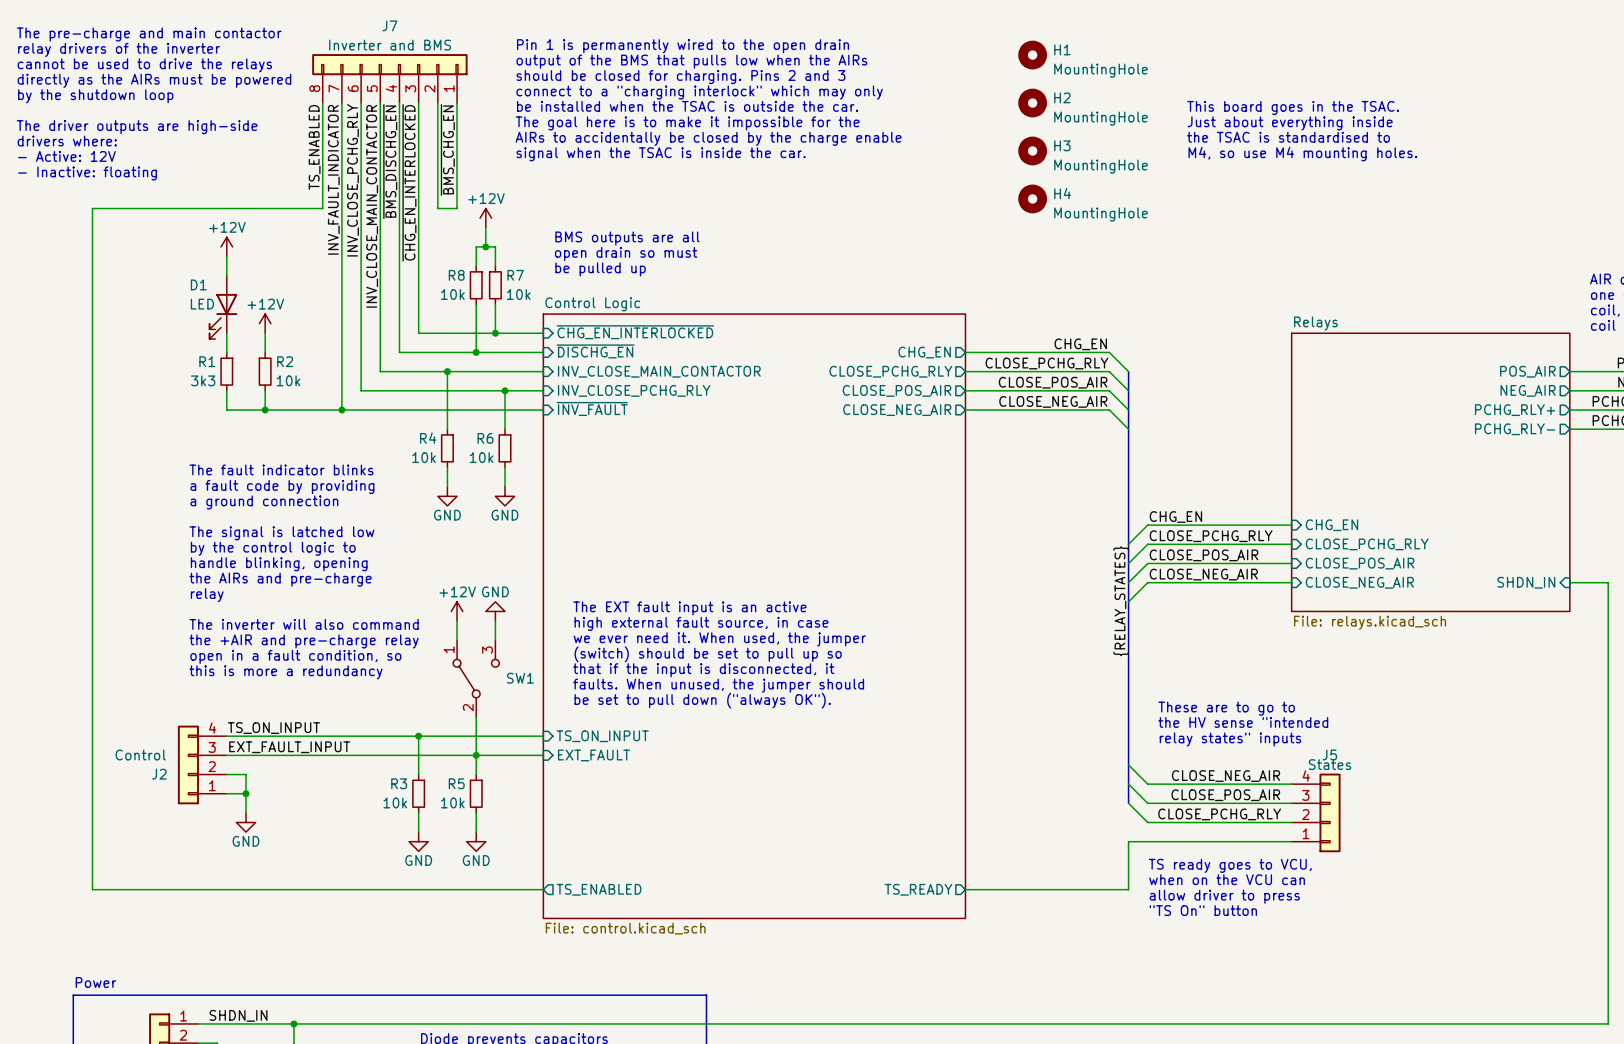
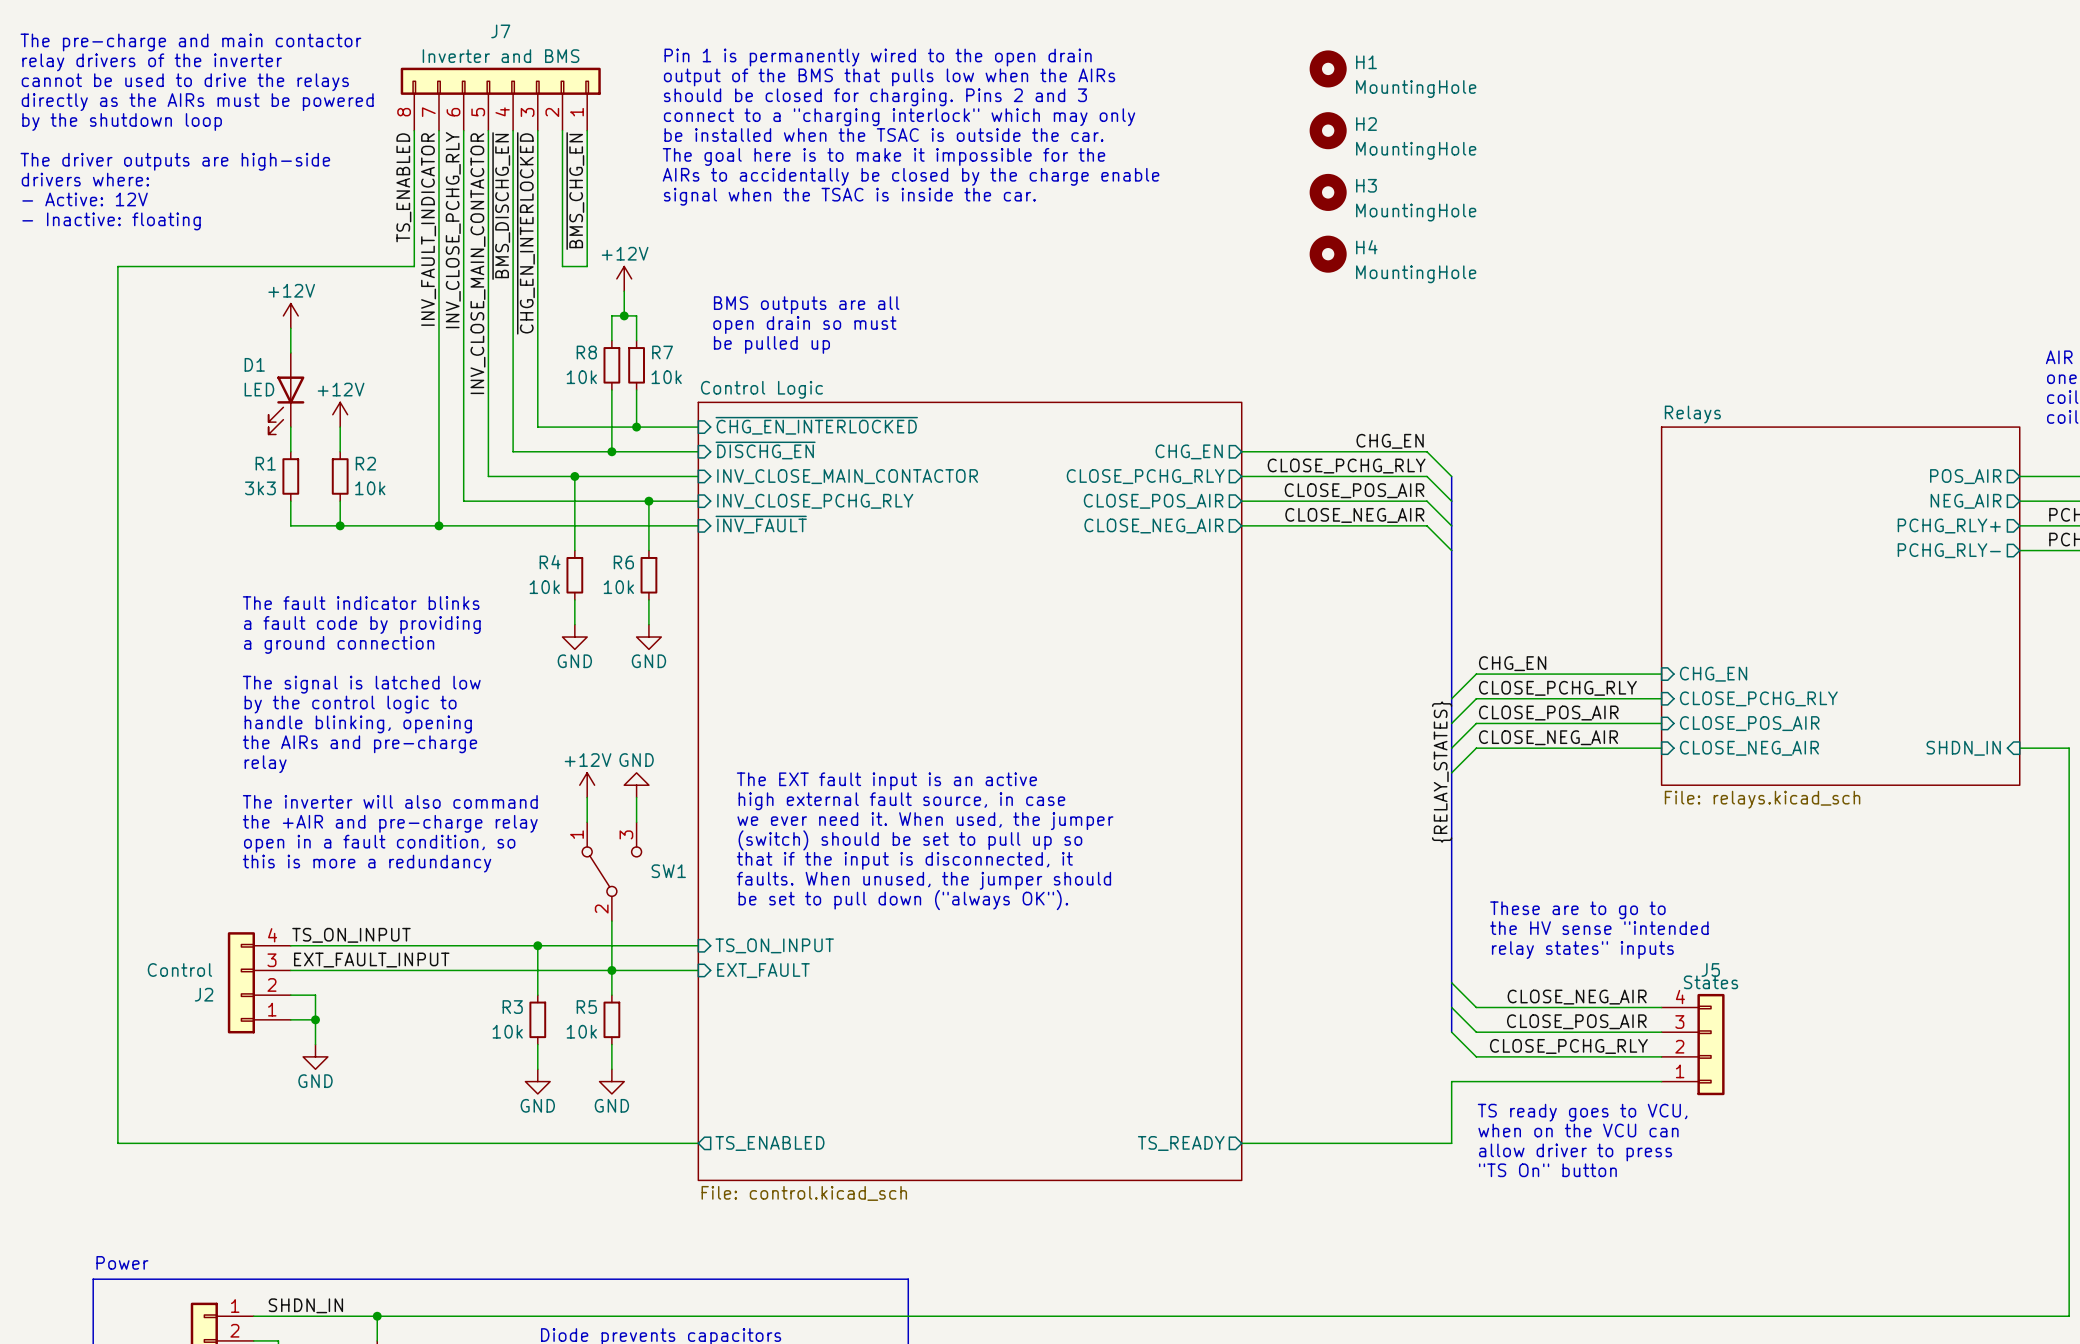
text: This board goes in the TSAC. (1293, 107) -> none
text: Just about everything inside (1290, 123) -> none
text: the TSAC is standardised to (1288, 137) -> none
text: M4, so use M4 mounting holes. (1302, 154) -> none

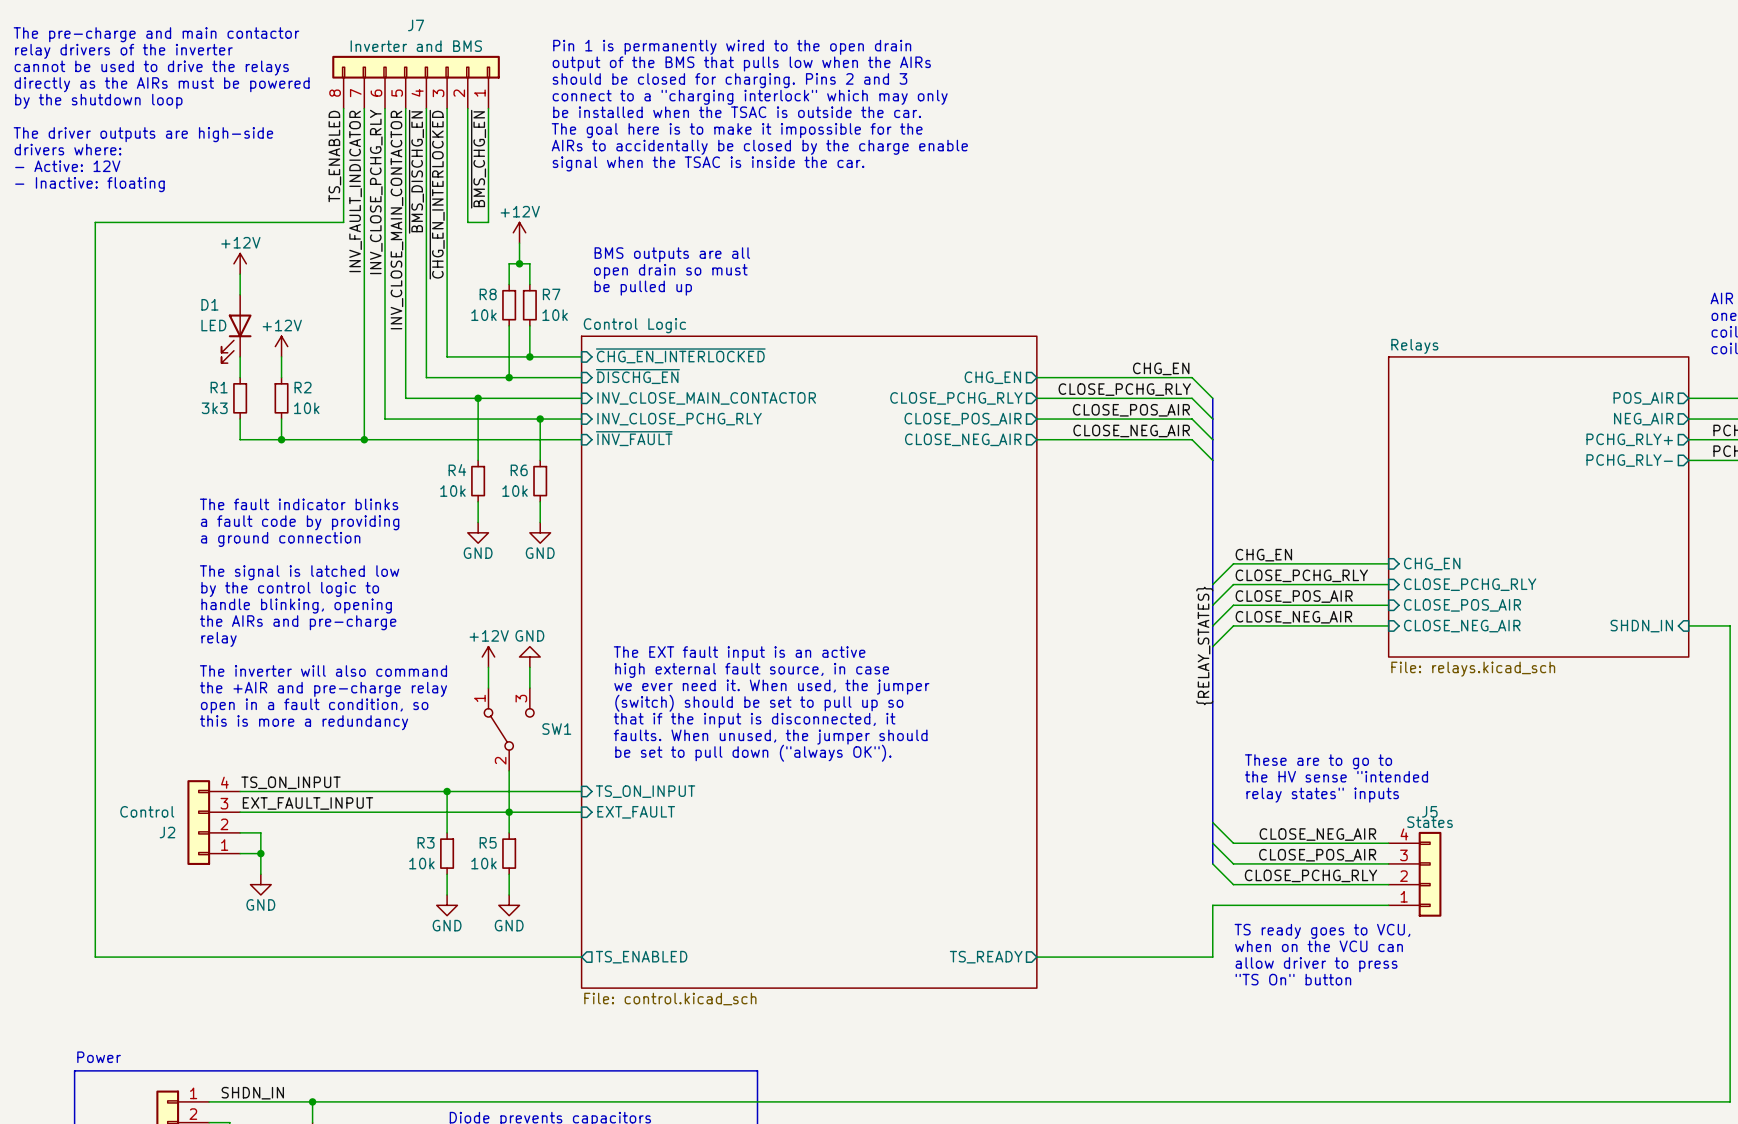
H1: MountingHole (1328, 68) -> none
H2: MountingHole (1328, 130) -> none
H3: MountingHole (1328, 192) -> none
H4: MountingHole (1328, 254) -> none

